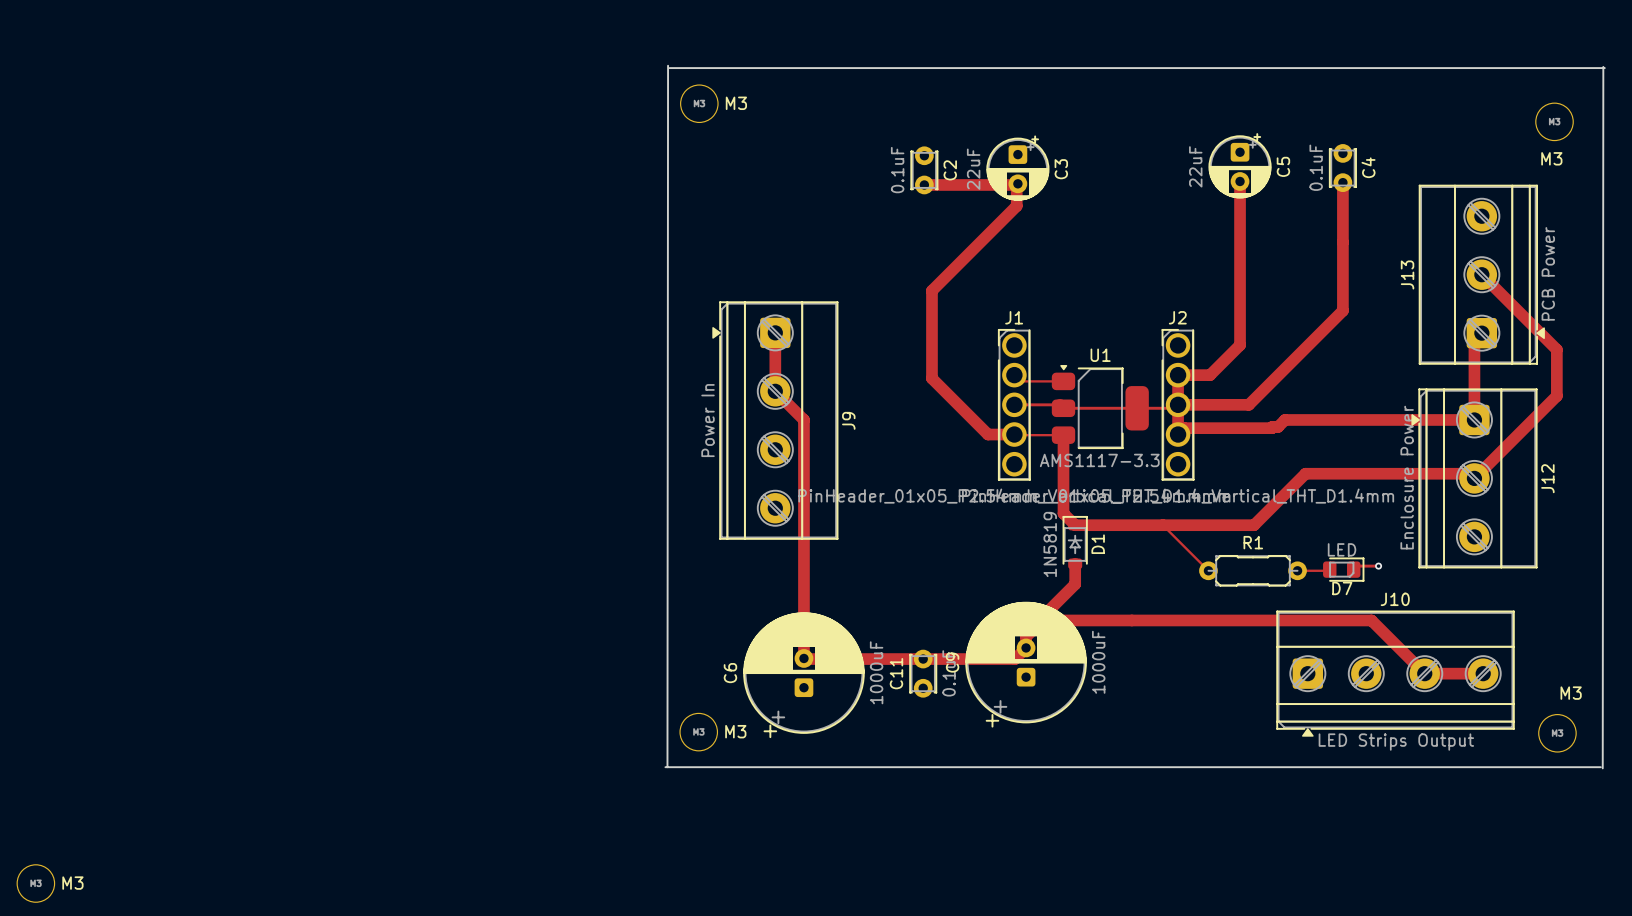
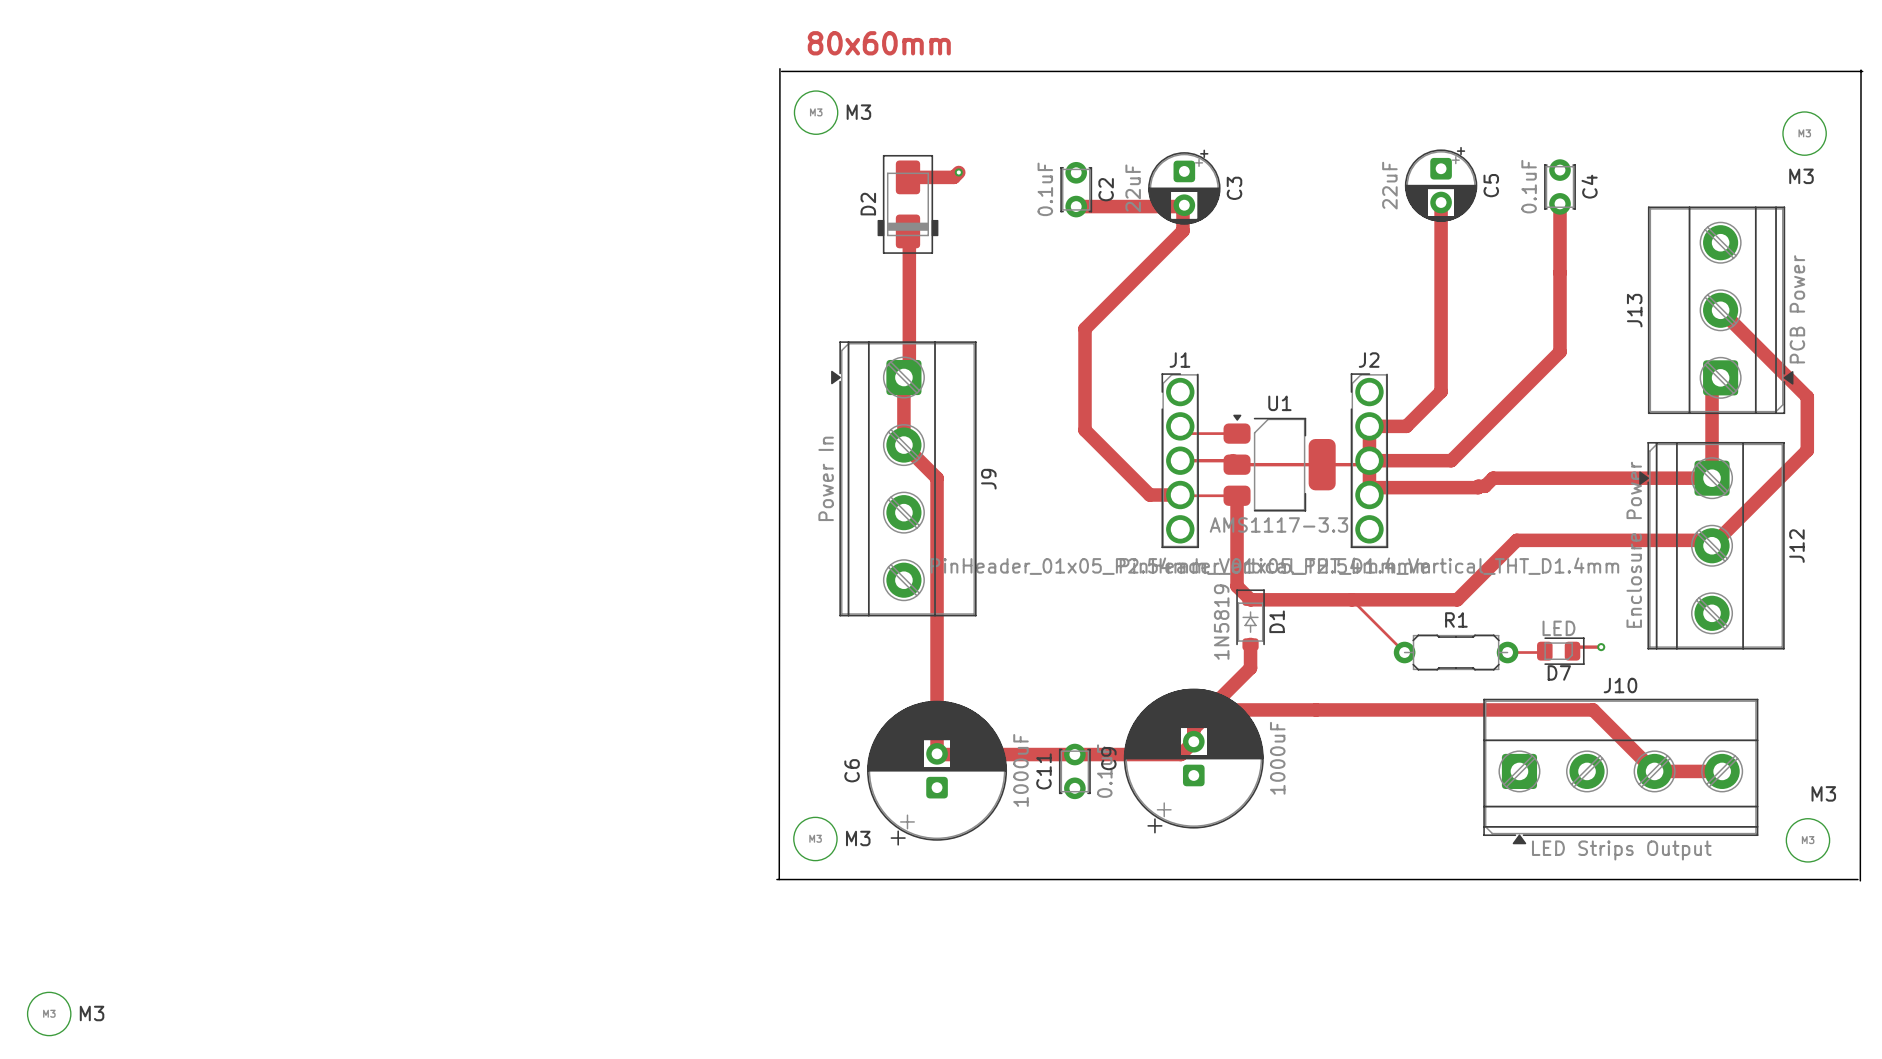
text: none -> 80x60mm (879, 43)
track: none -> (958, 172) (953, 177) (907, 177)
via: none -> (958, 172)
D2: none -> (907, 204)
track: none -> (909, 231) (909, 372) (903, 377)

